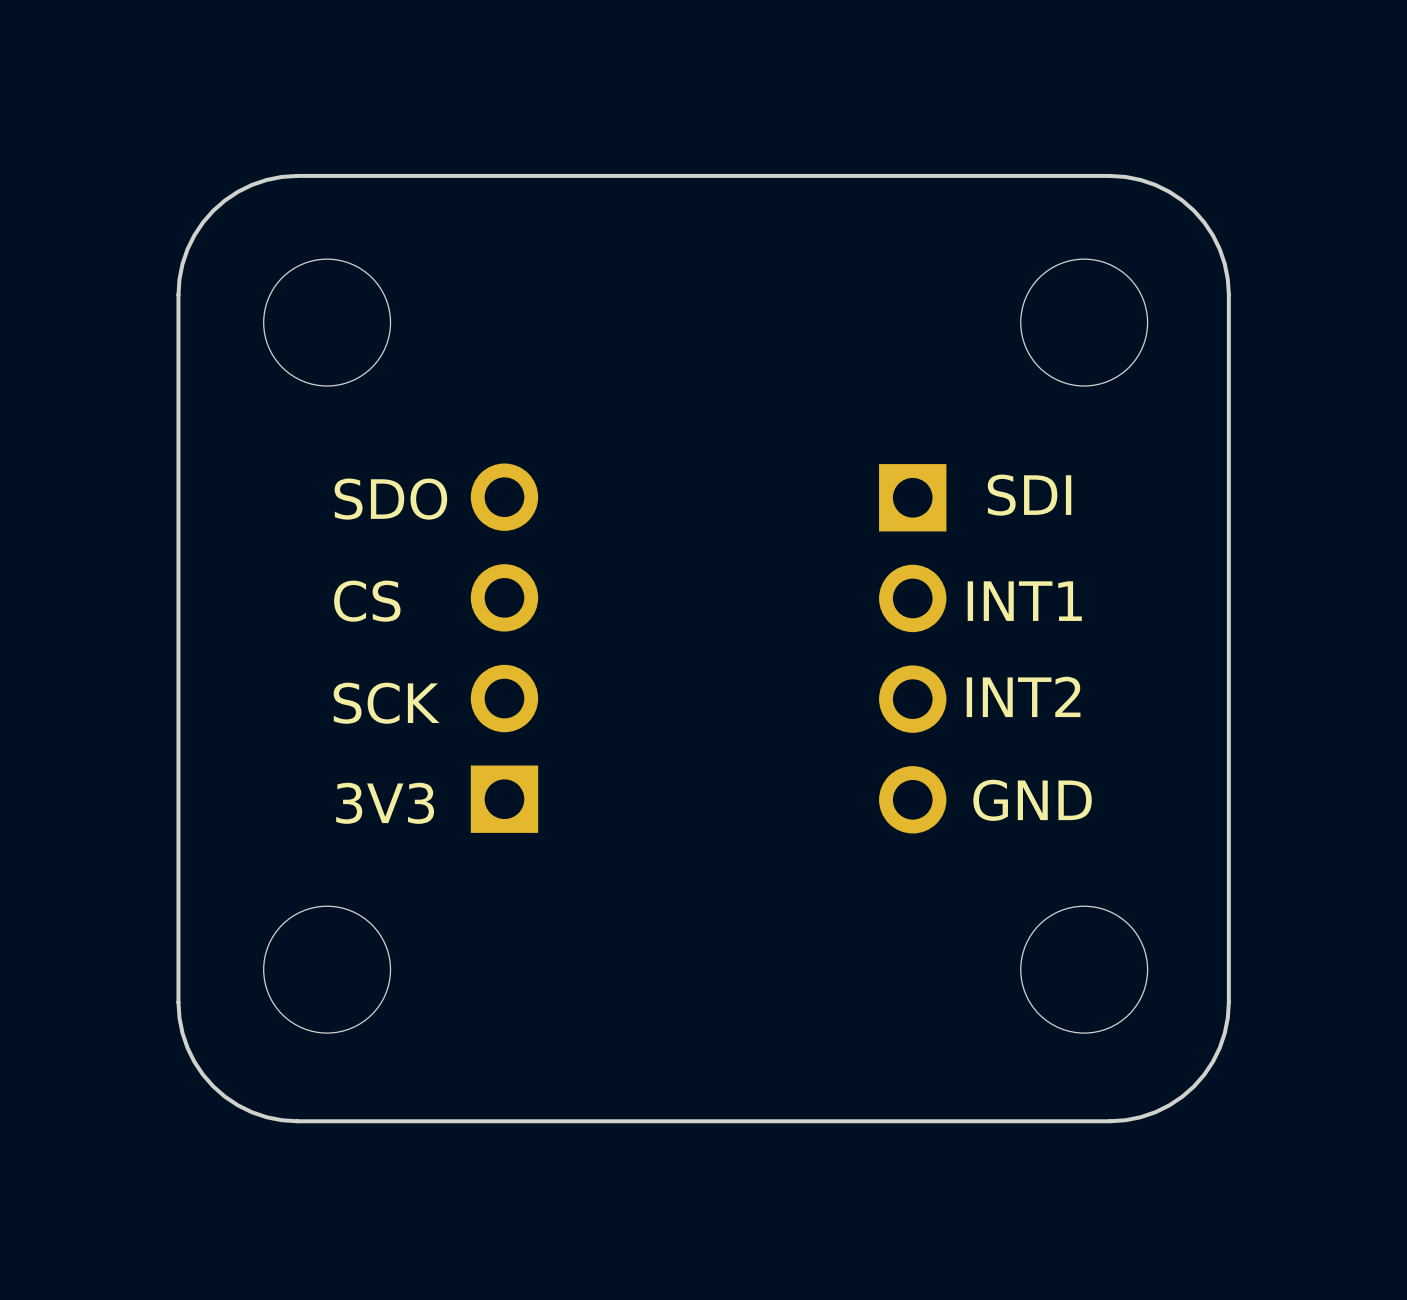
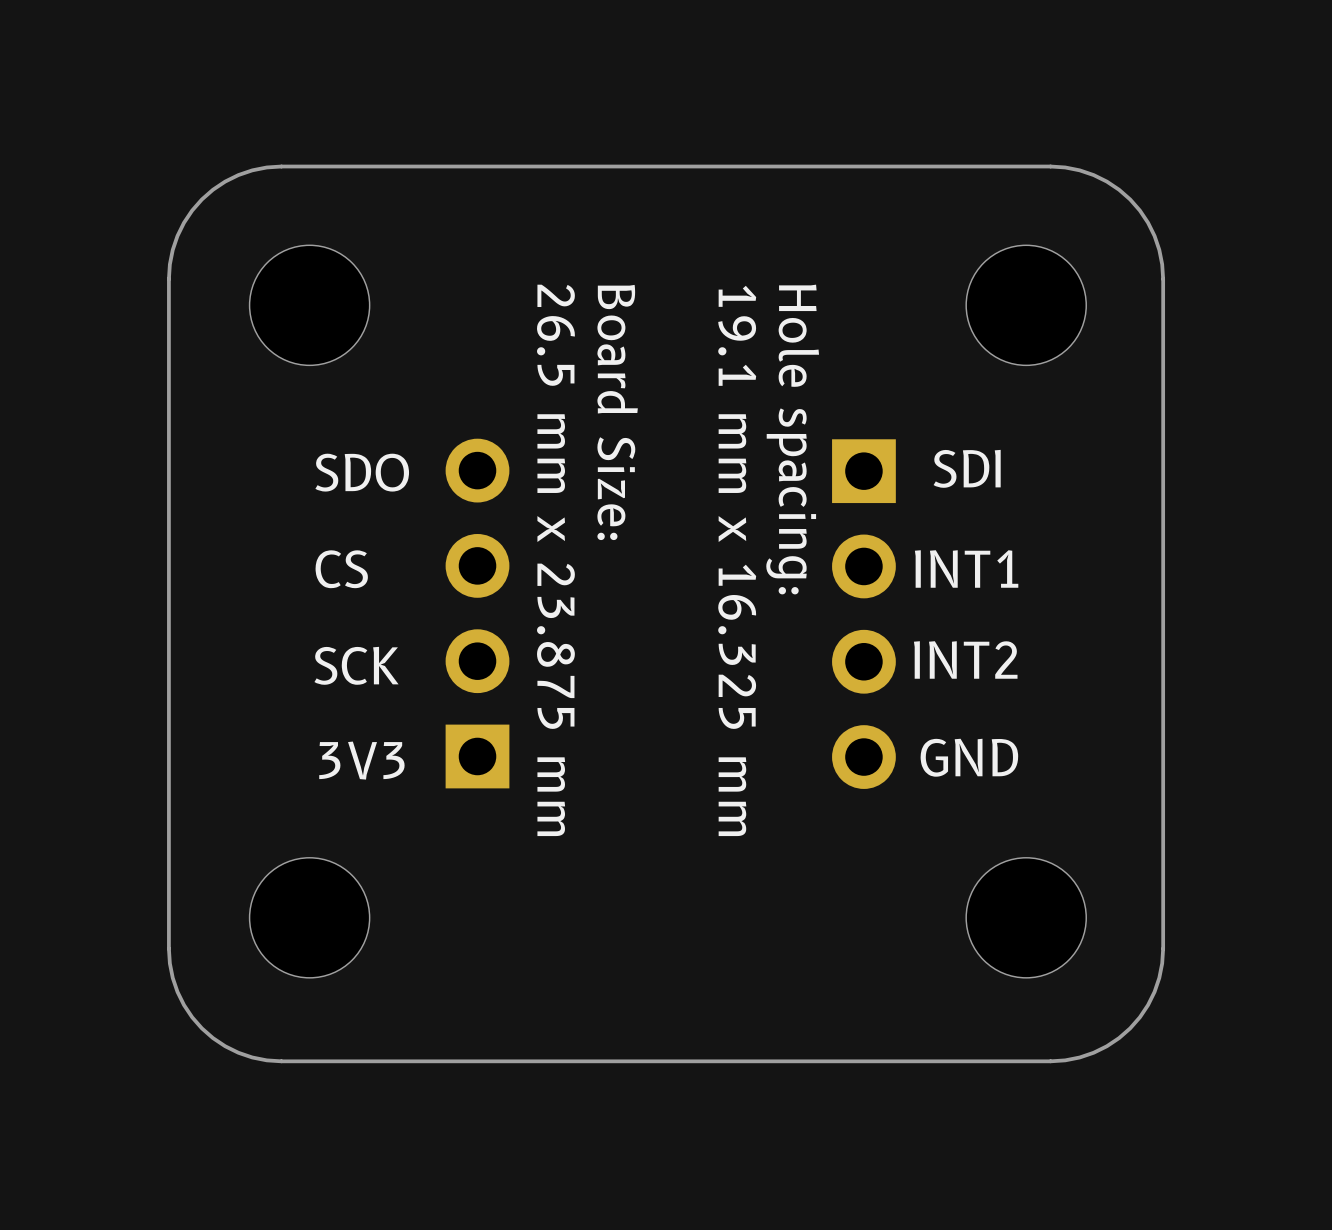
text: none -> Board Size: (617, 412)
text: none -> Hole spacing: (792, 439)
text: none -> 26.5 mm x 23.875 mm (555, 560)
text: none -> 19.1 mm x 16.325 mm (737, 560)

